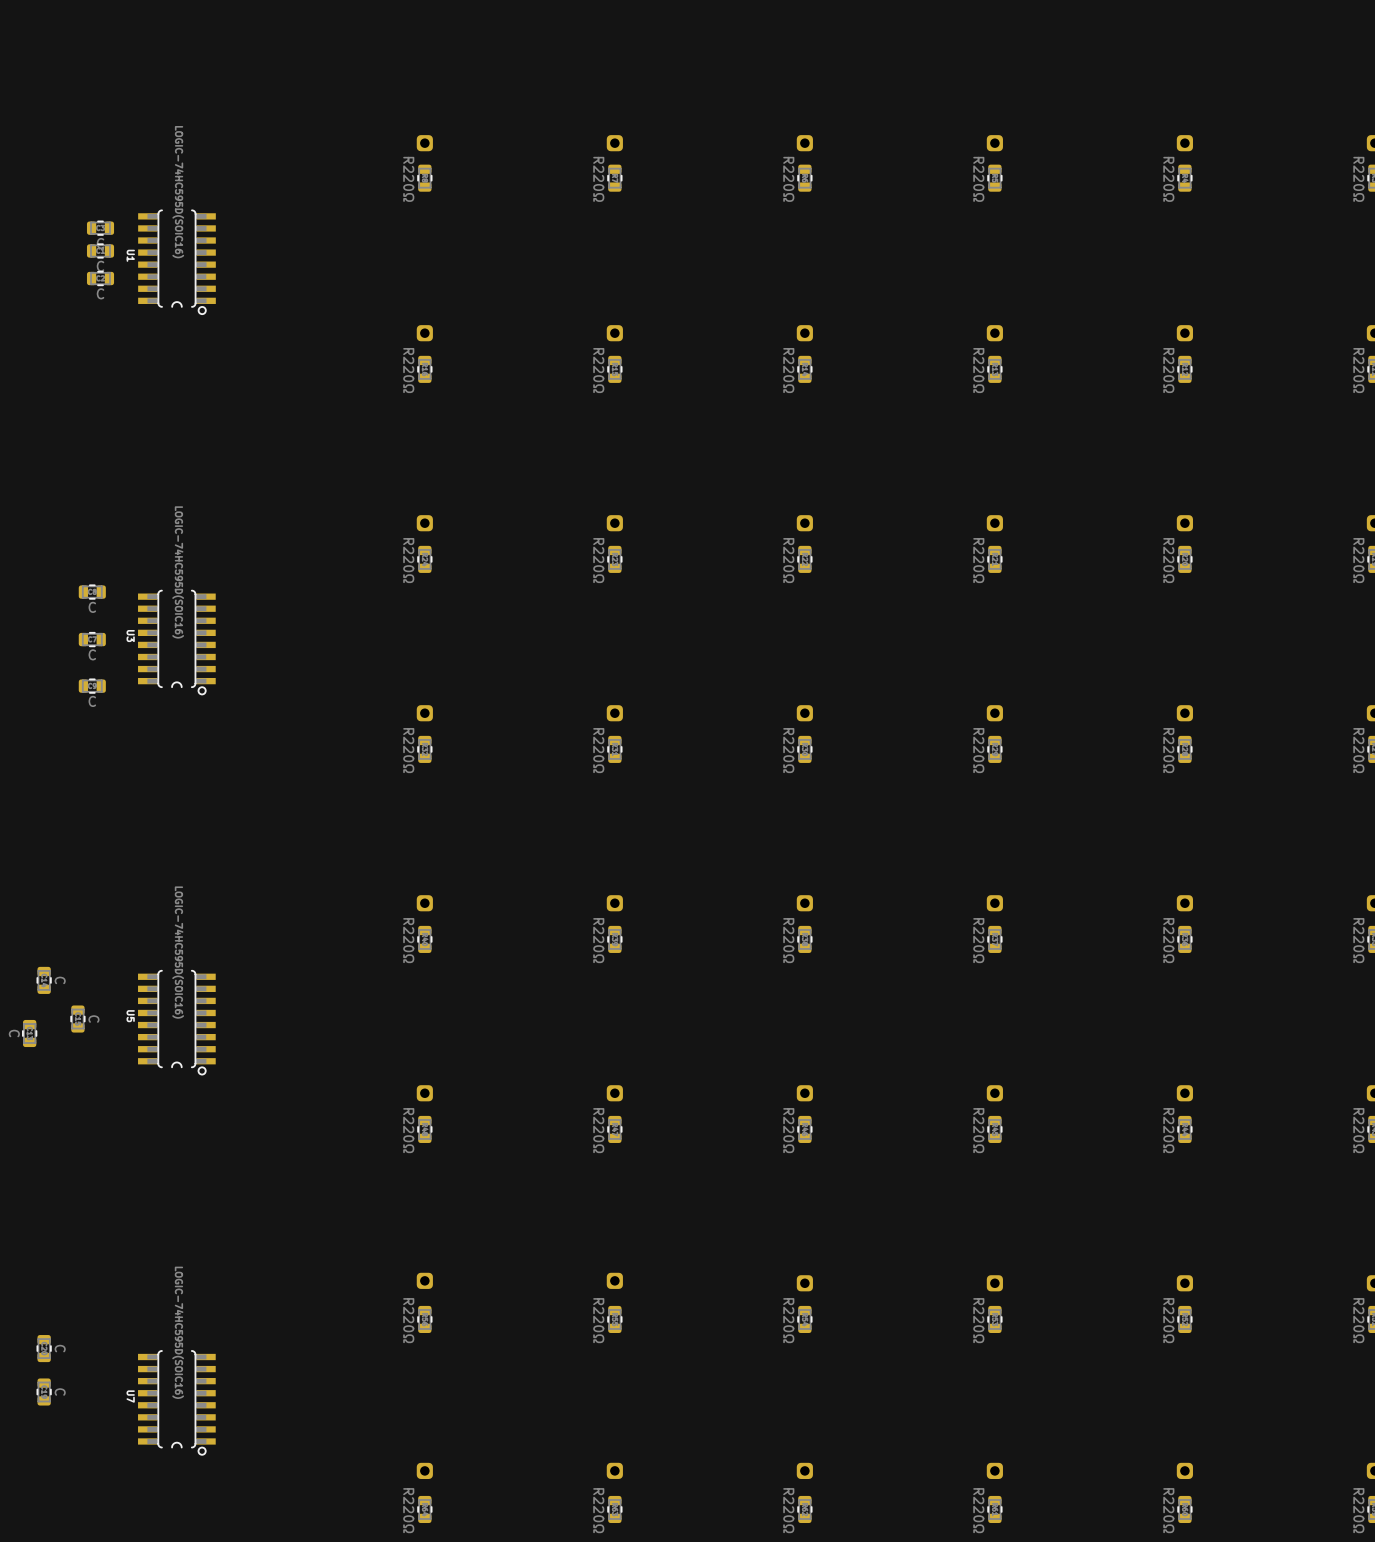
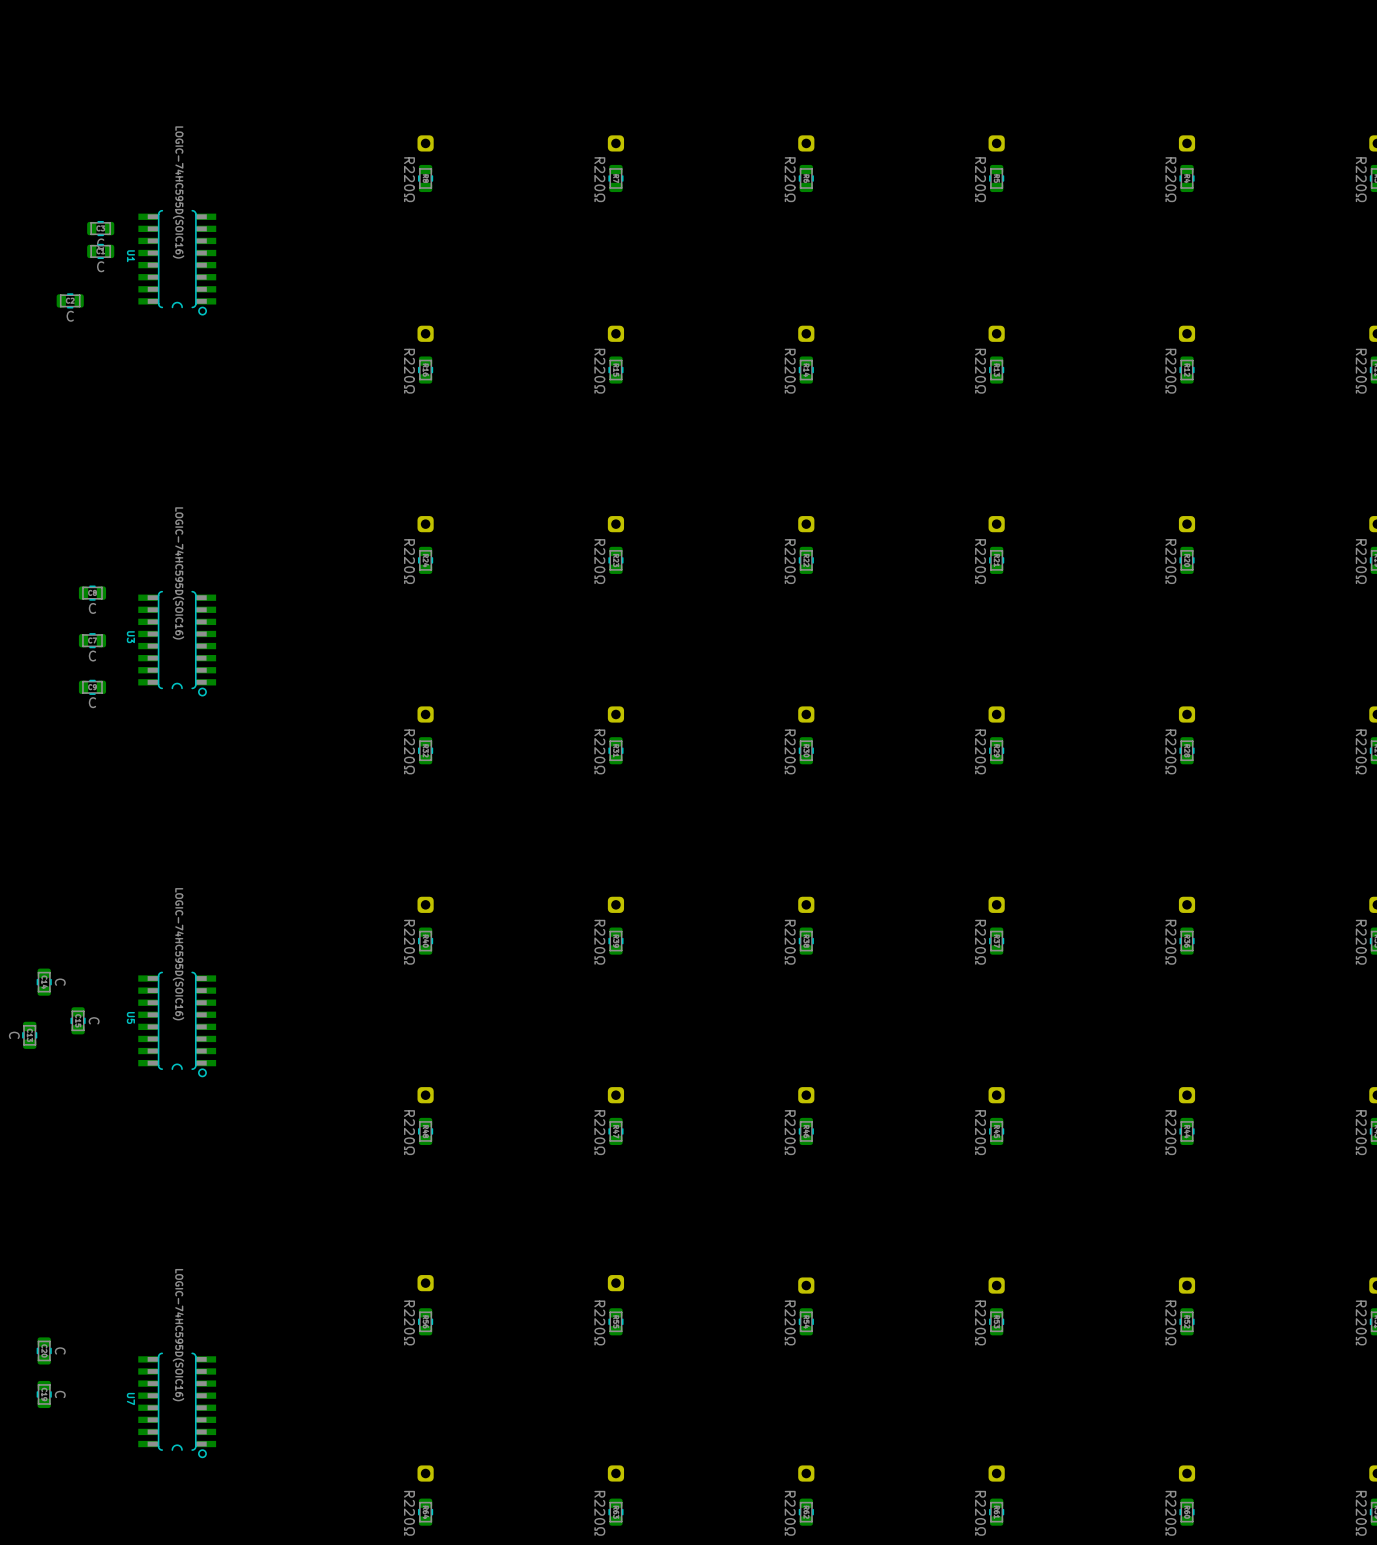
part position: (100, 278) -> (70, 300)

